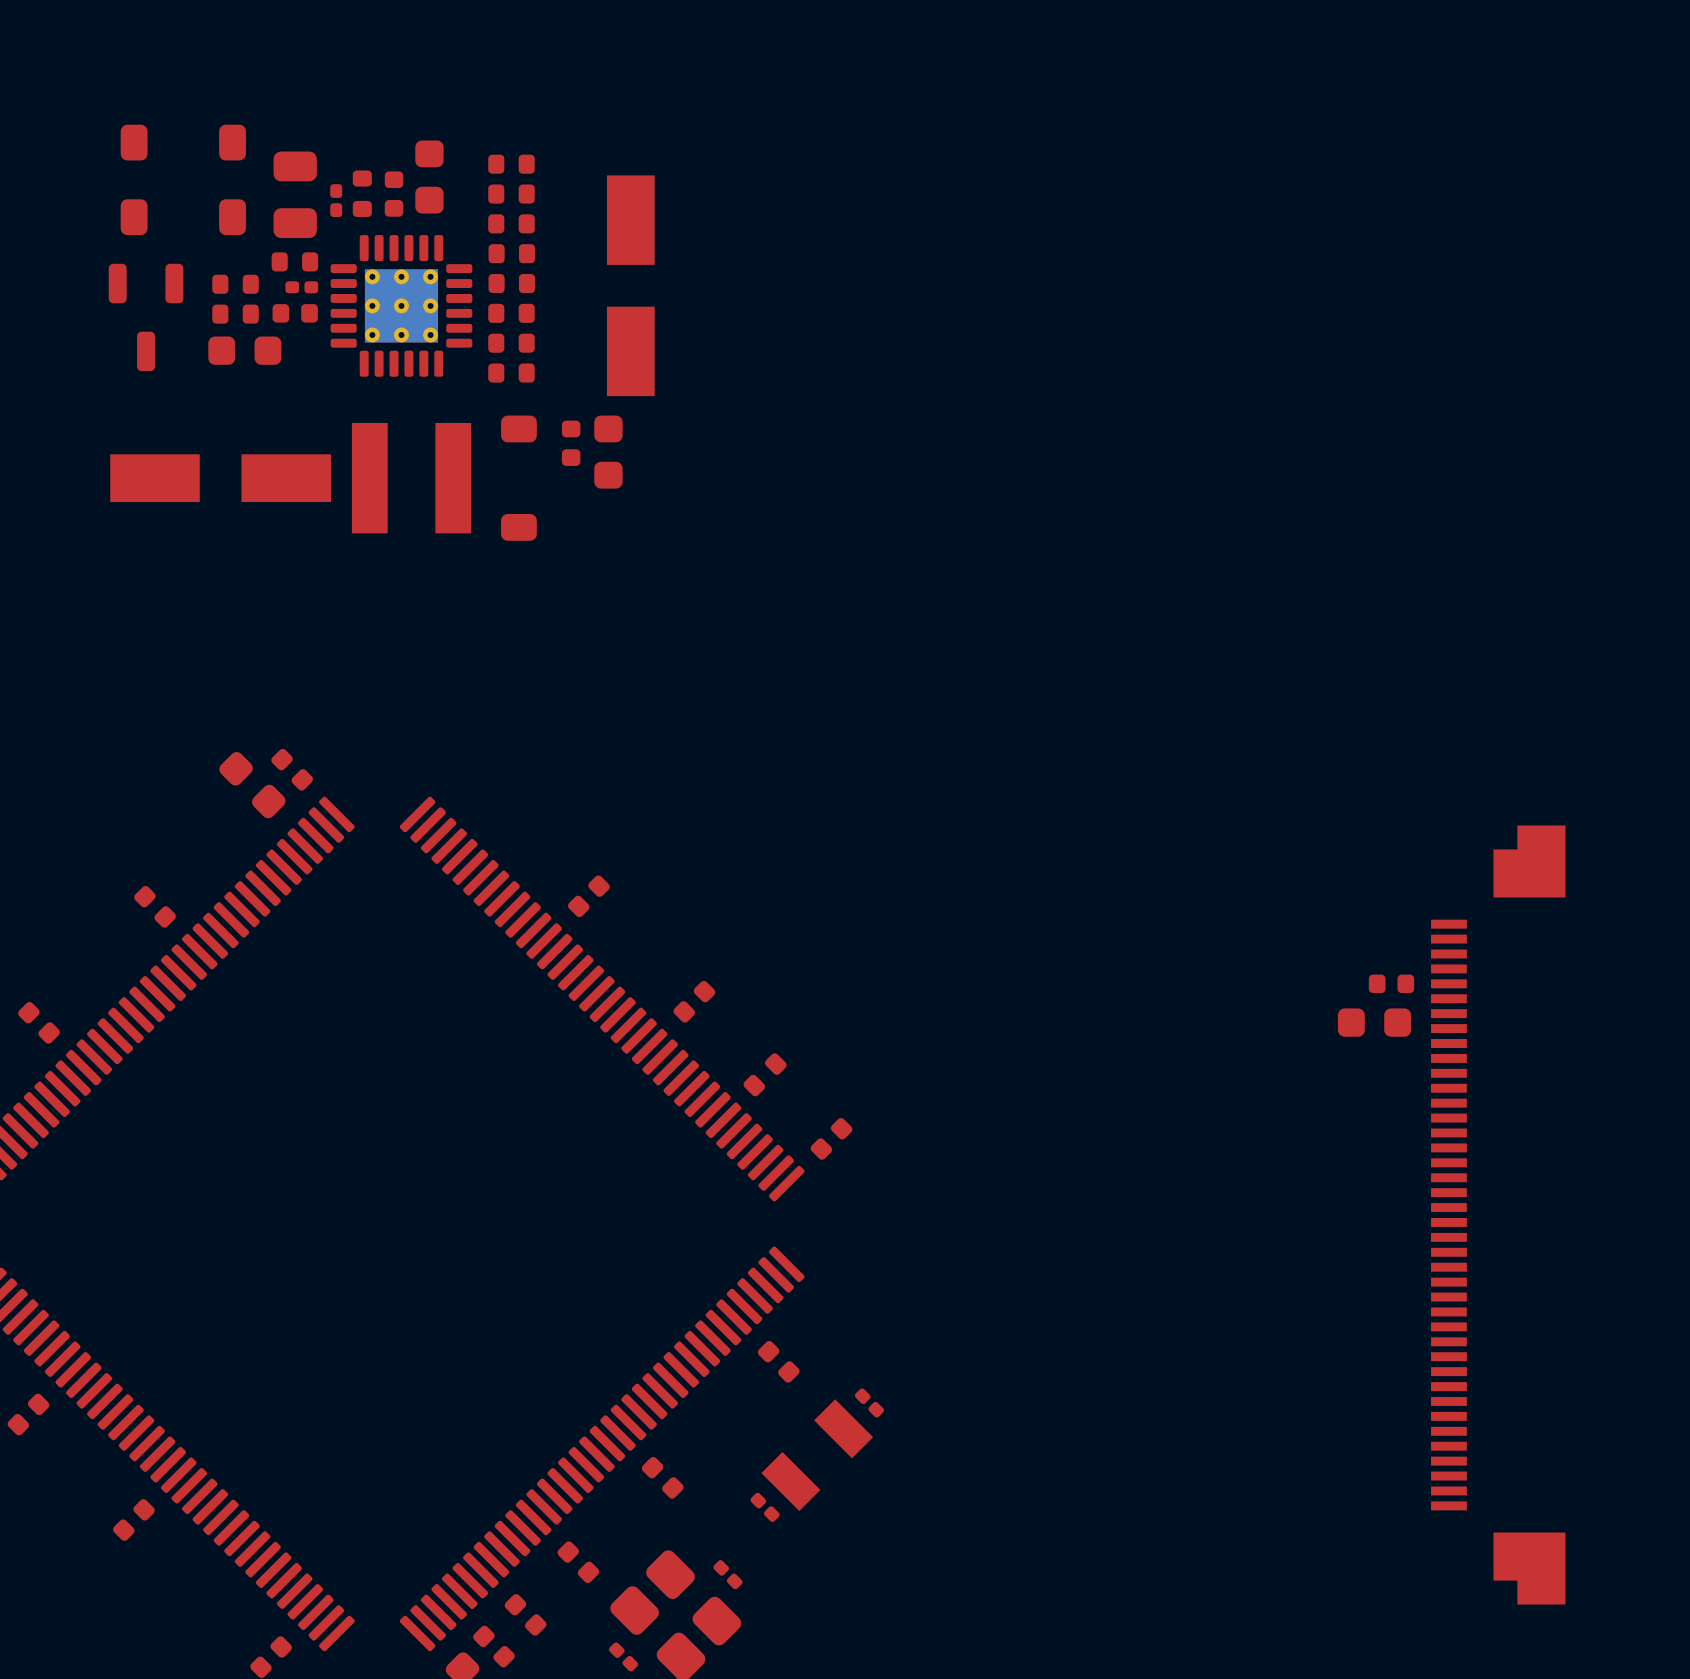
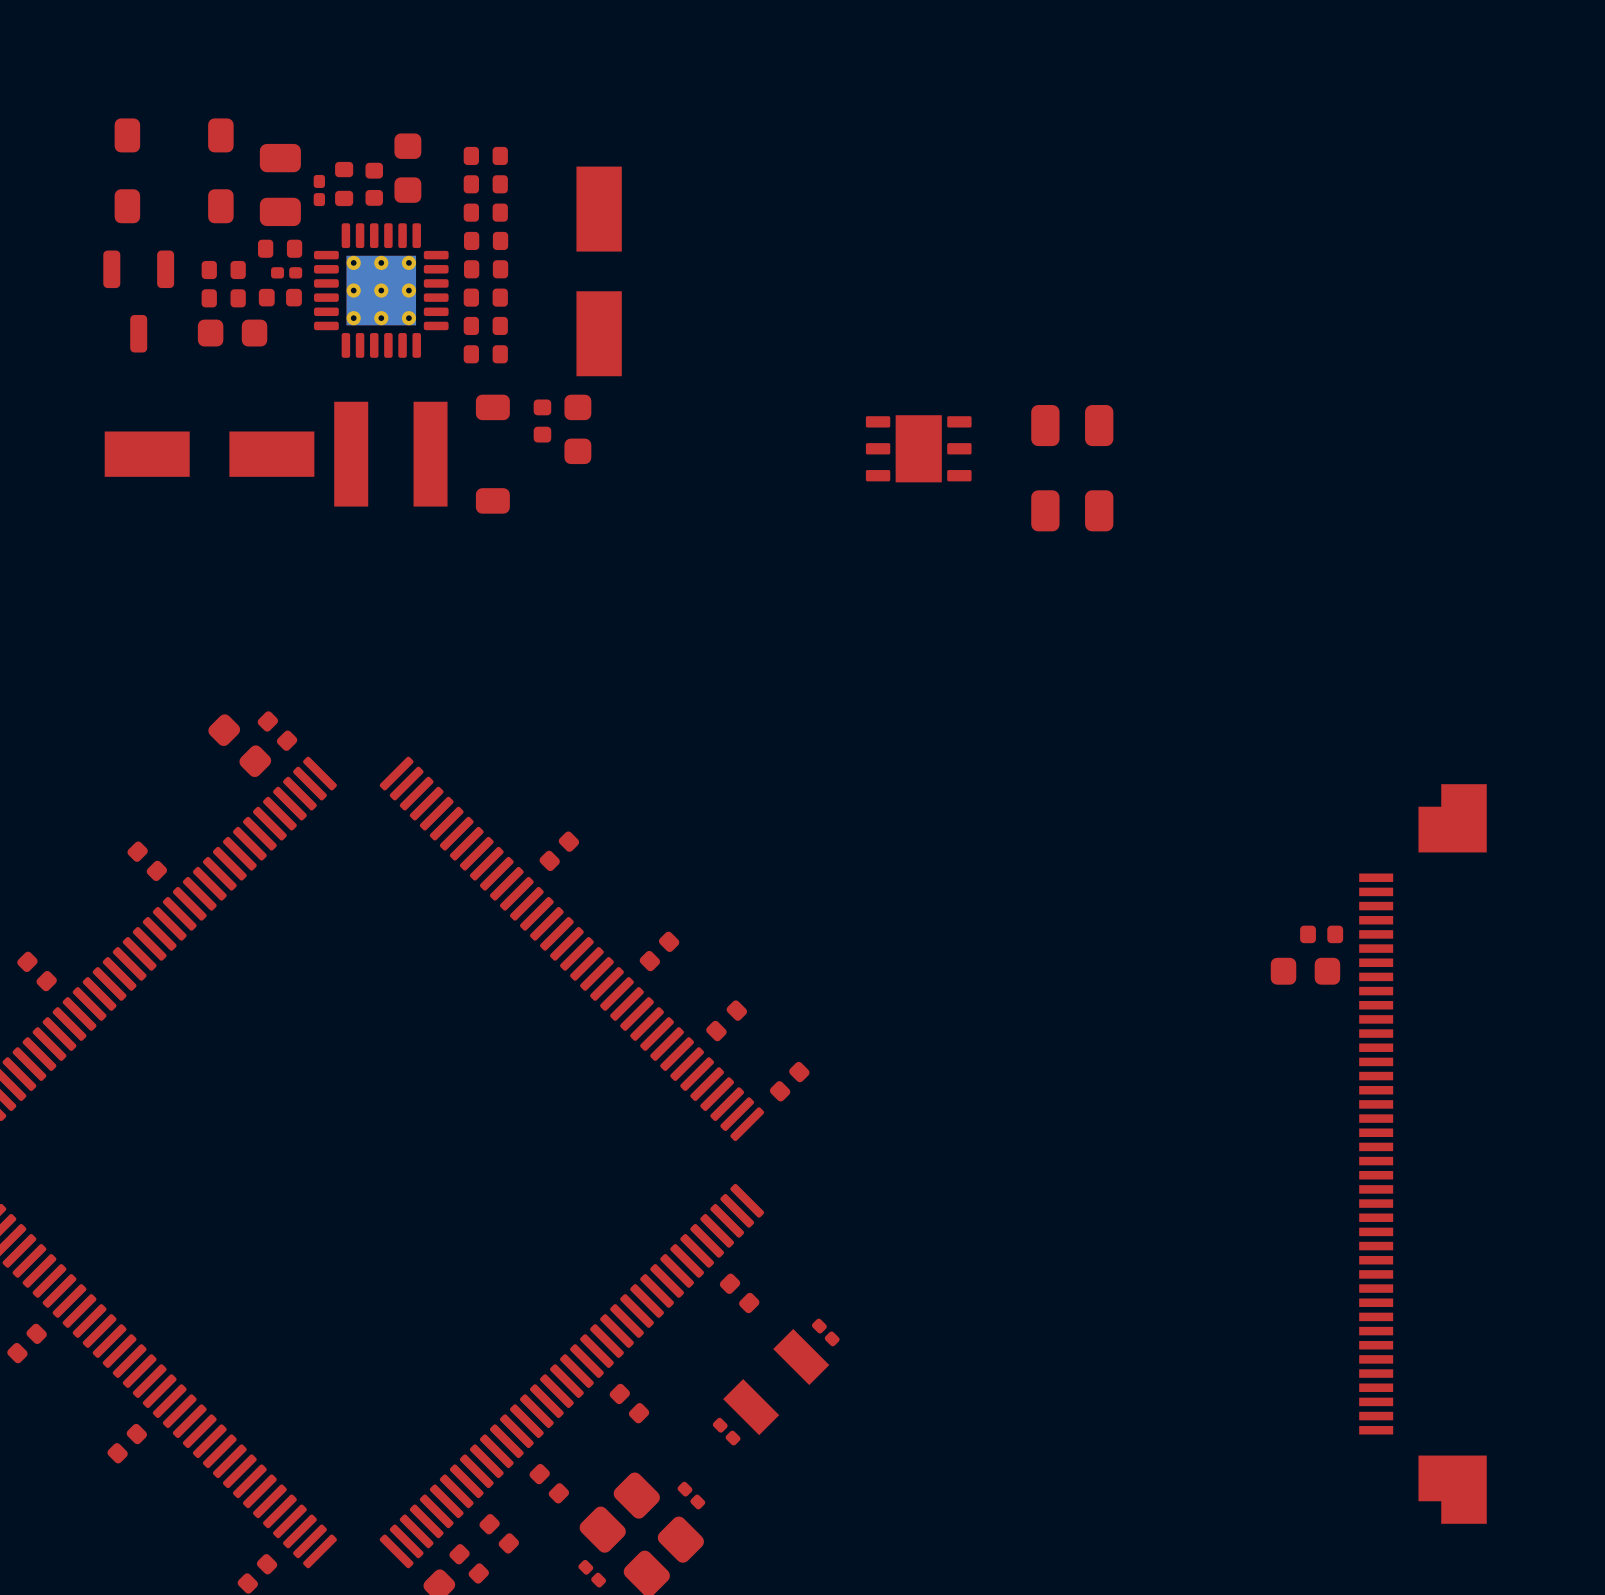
part: none -> (1072, 425)
part: none -> (918, 448)
part: none -> (1072, 510)

